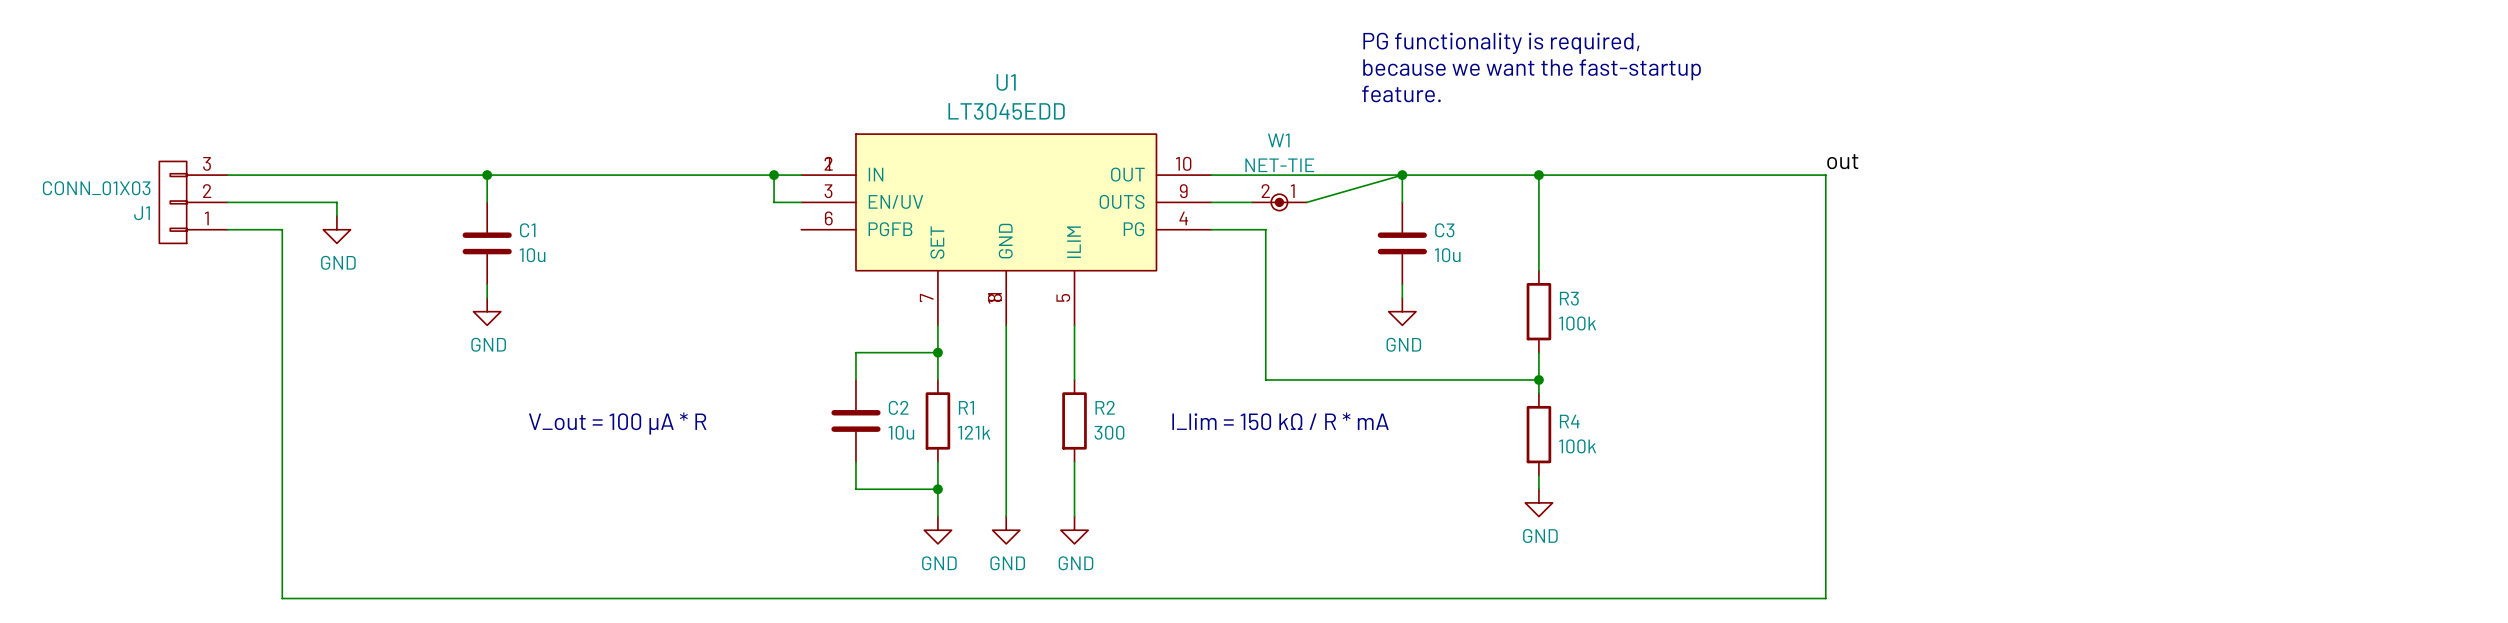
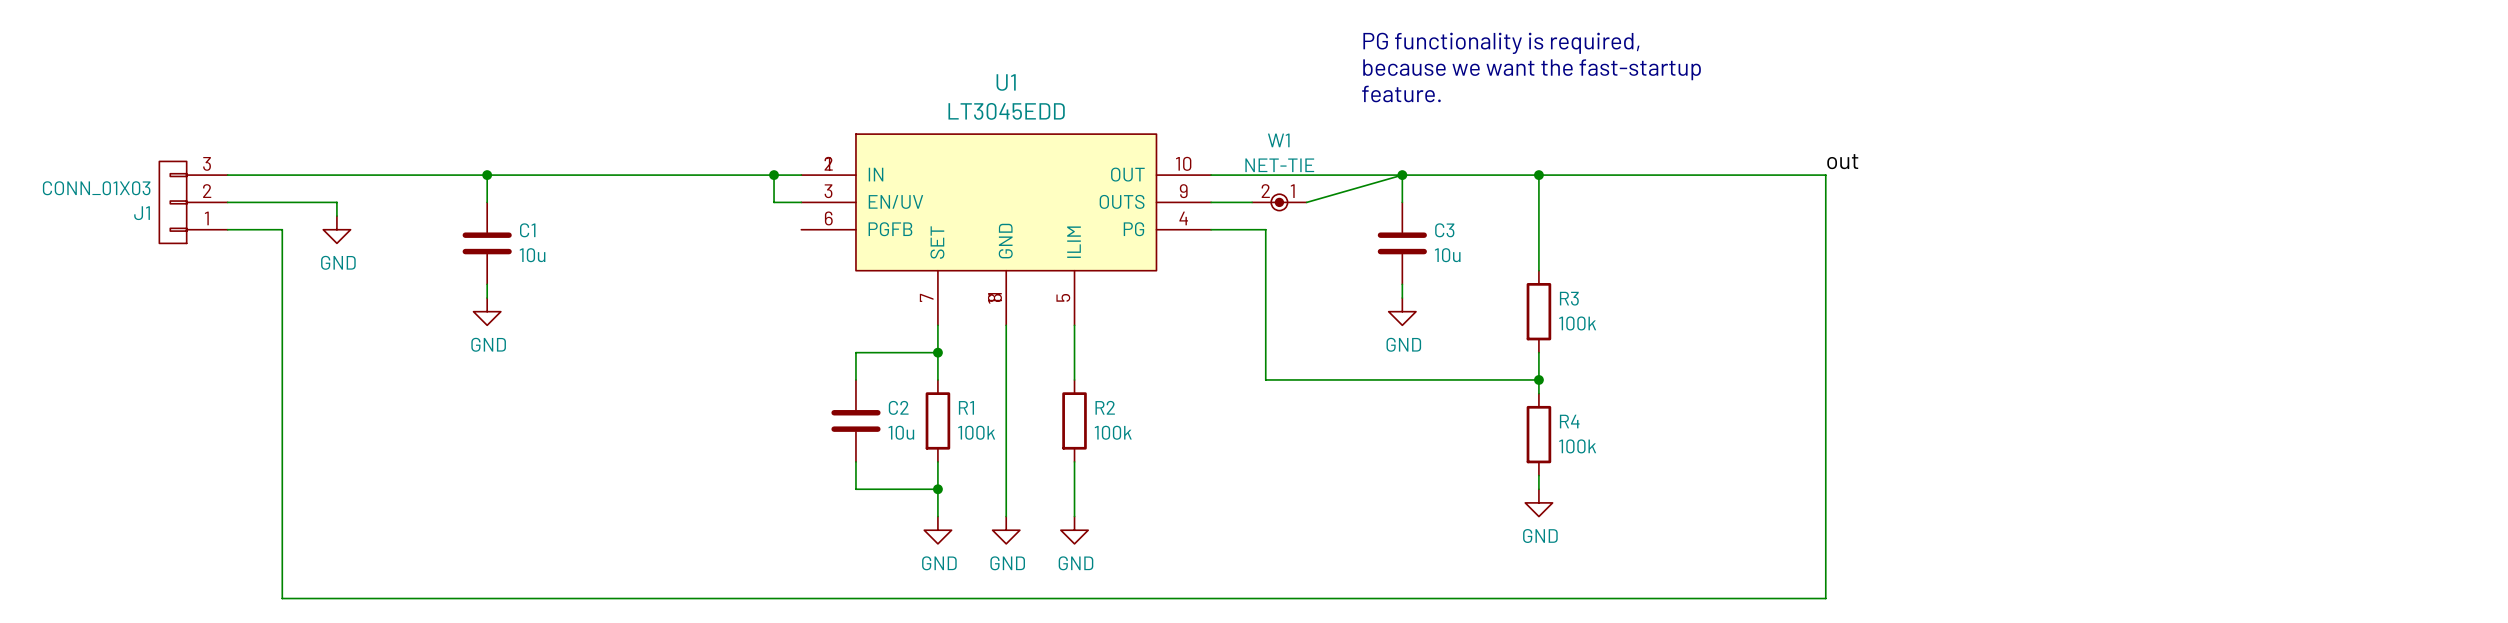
text: I_lim = 150 kΩ / R * mA (1280, 421) -> none
text: V_out = 100 µA * R (617, 423) -> none
R1 value: 121k (974, 432) -> 100k (976, 432)
R2 value: 300 (1109, 432) -> 100k (1113, 432)

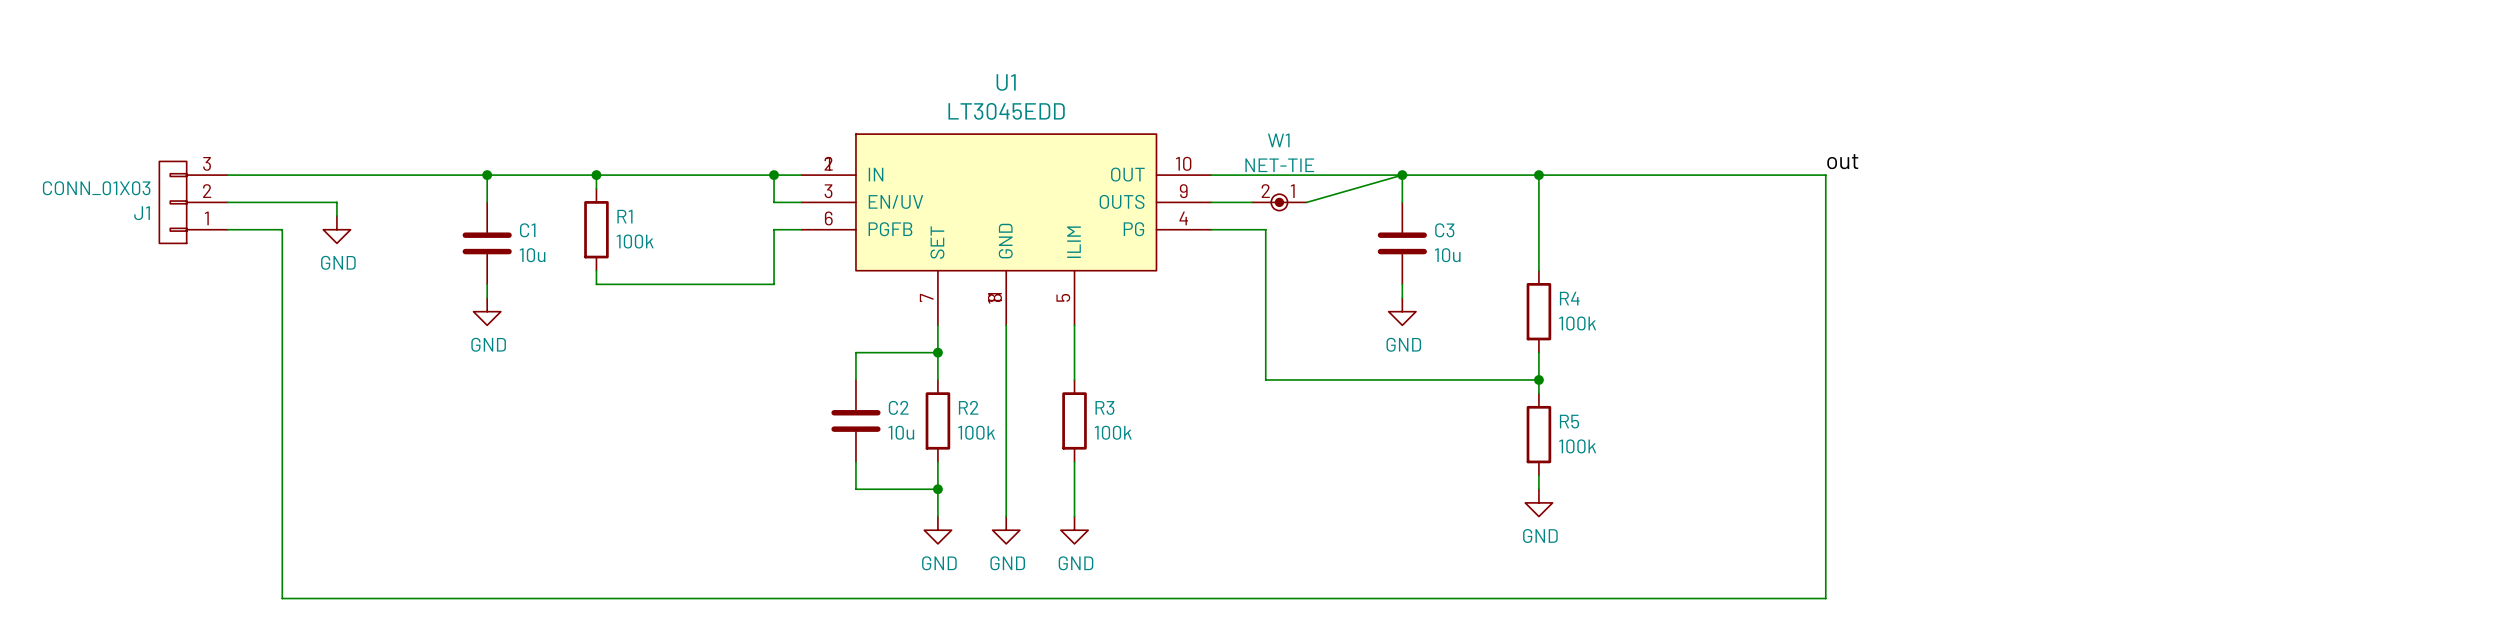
text: PG functionality is required, (1501, 43) -> none
text: because we want the fast-startup (1532, 69) -> none
text: feature. (1401, 94) -> none
wire: none -> (596, 175) (596, 188)
junction: none -> (596, 175)
R1: none -> 100k (596, 229)
wire: none -> (801, 229) (774, 229) (774, 284) (596, 284) (596, 270)
R3 name: R3 (1569, 298) -> R4 (1569, 298)
R1 name: R1 (966, 407) -> R2 (968, 407)
R2 name: R2 (1105, 407) -> R3 (1104, 407)
R4 name: R4 (1569, 421) -> R5 (1569, 421)

